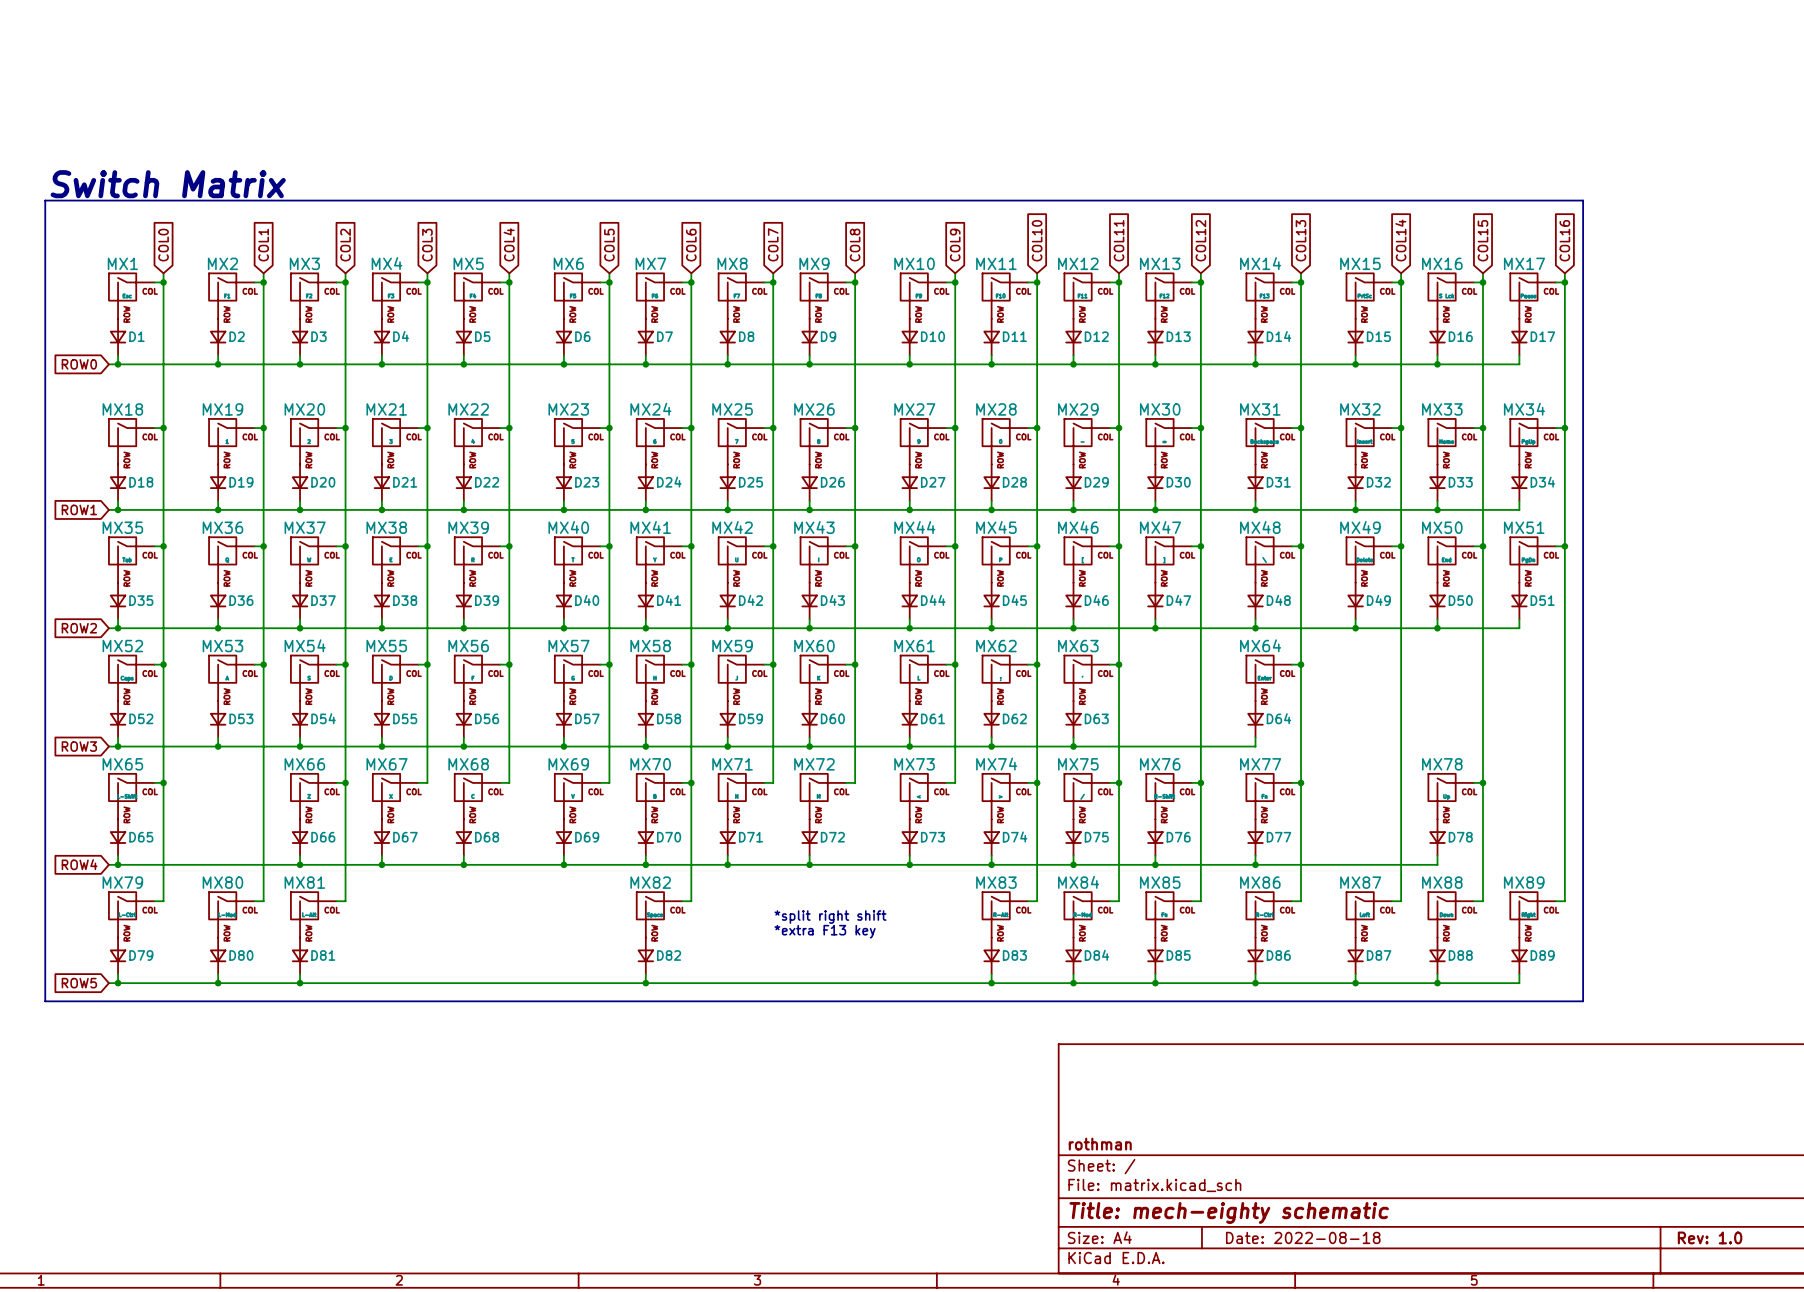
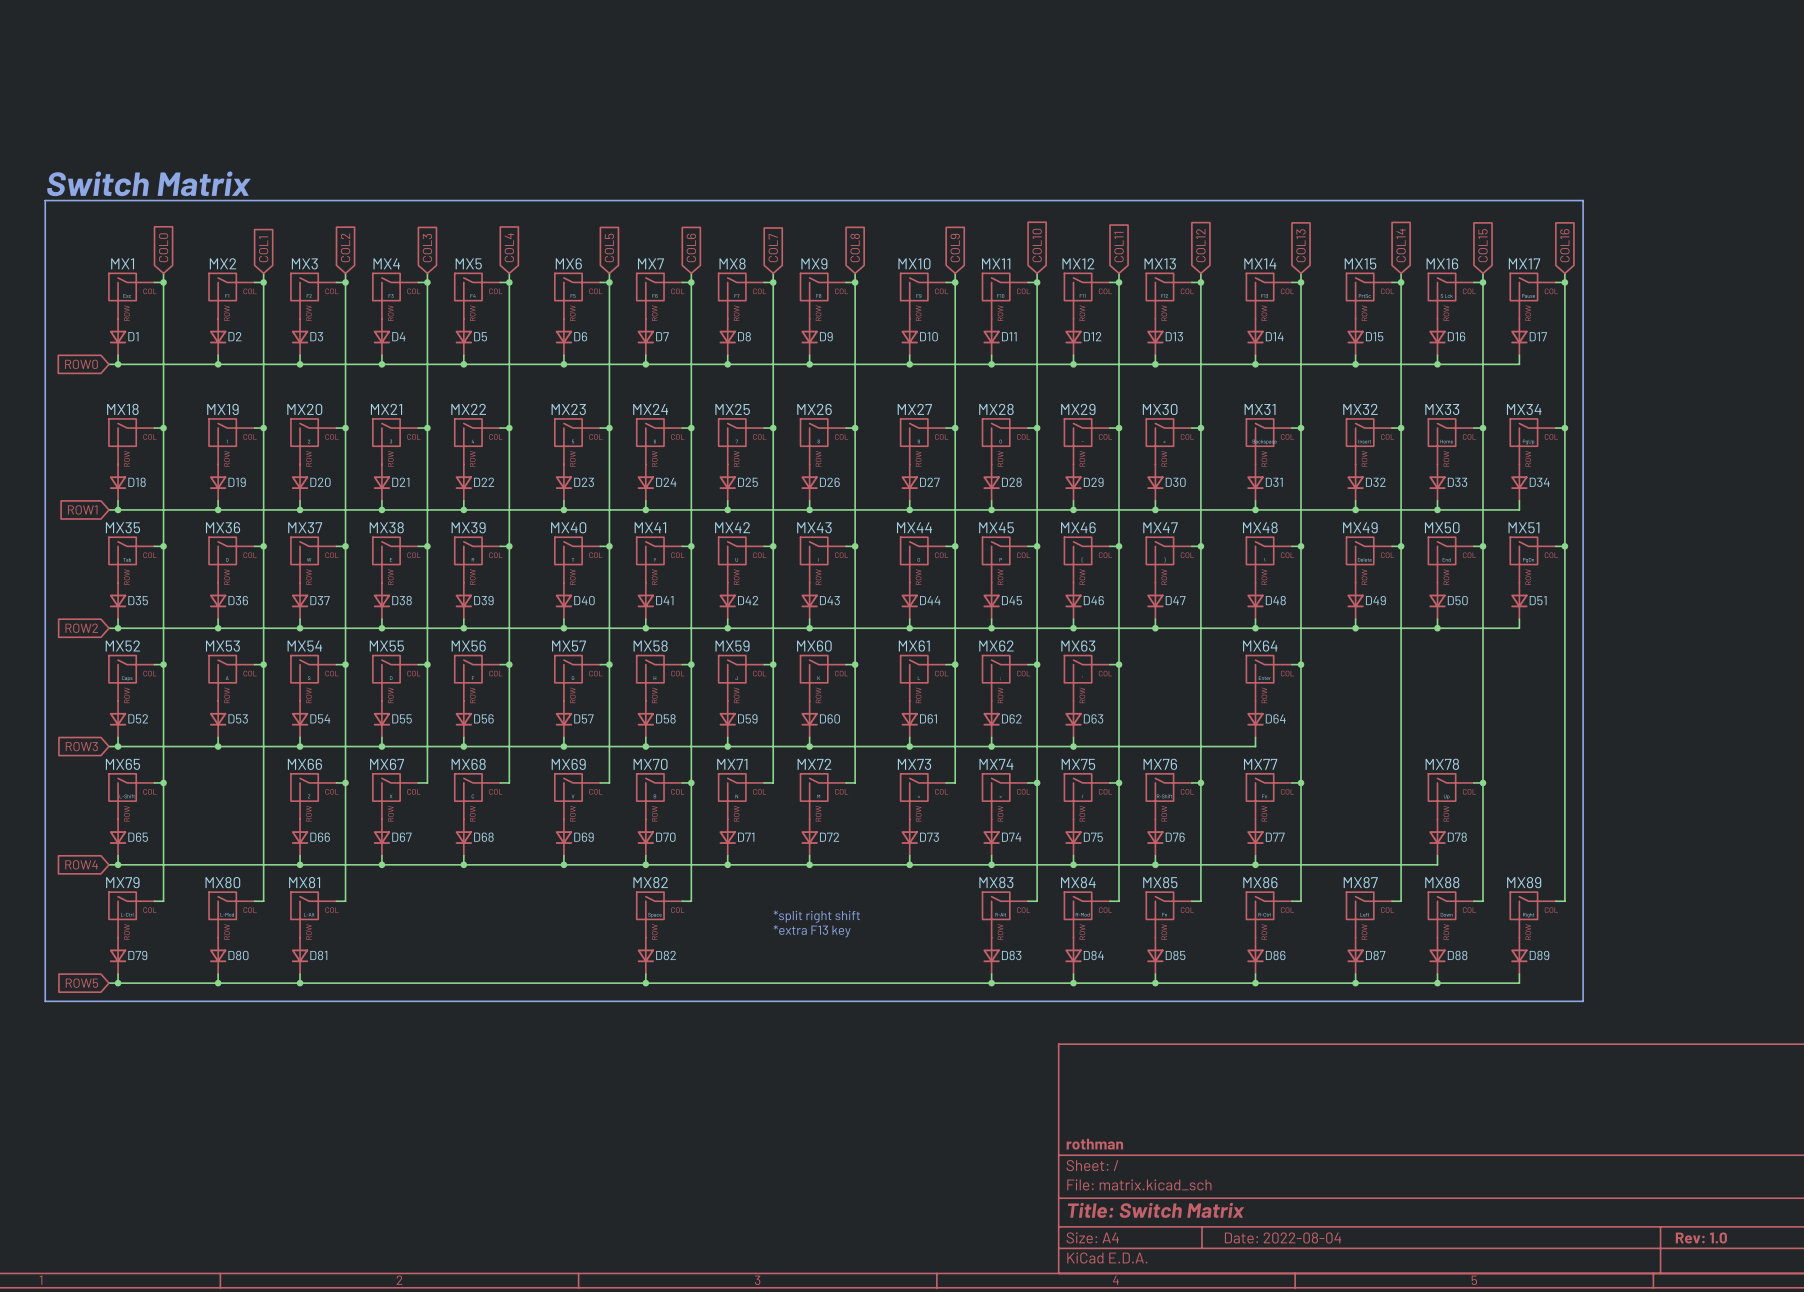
title block: Title: mech-eighty schematic (1229, 1212) -> Title: Switch Matrix (1156, 1210)
title block: Date: 2022-08-18 (1303, 1237) -> Date: 2022-08-04 (1283, 1237)

